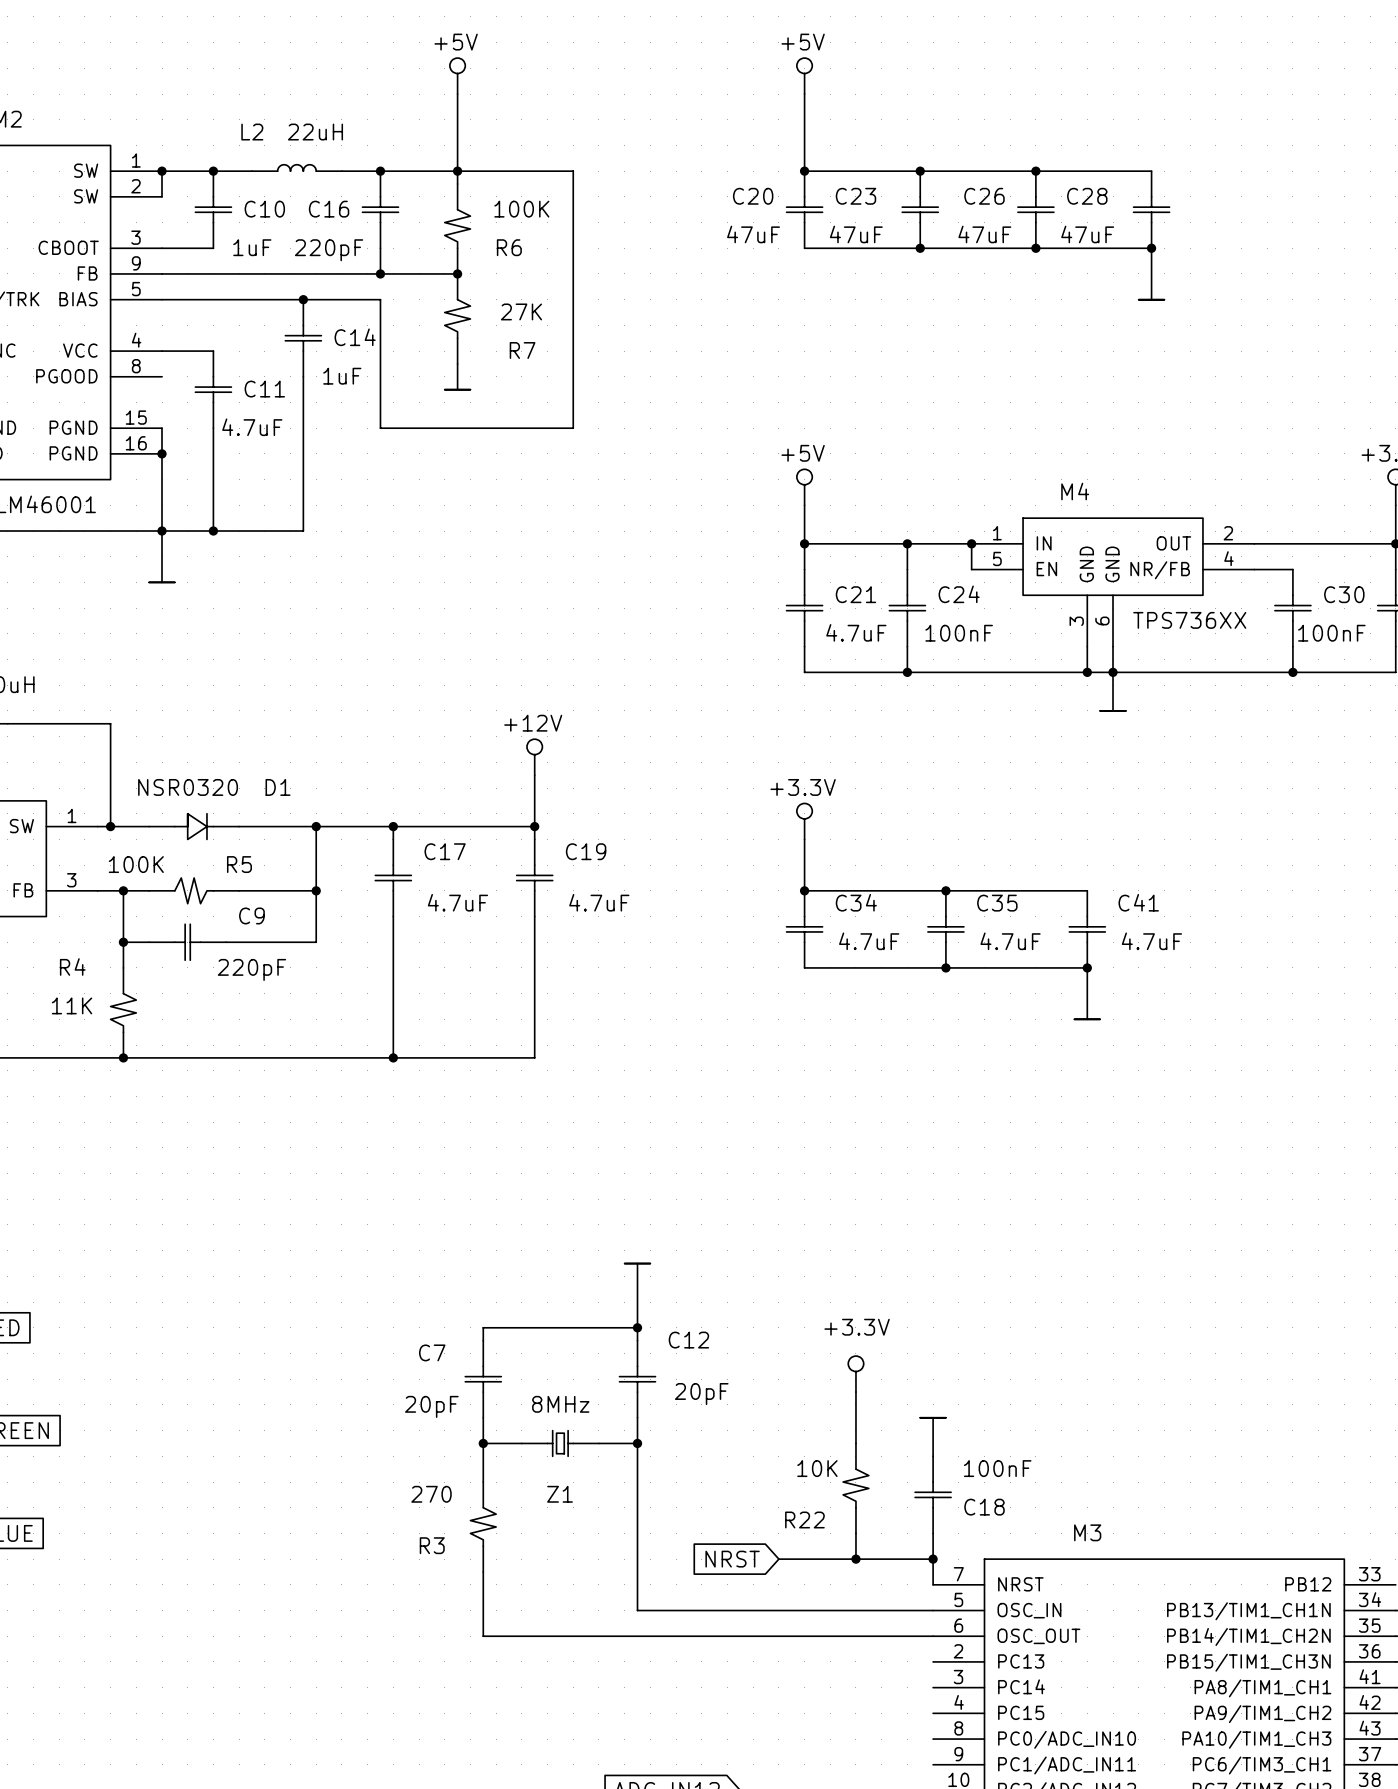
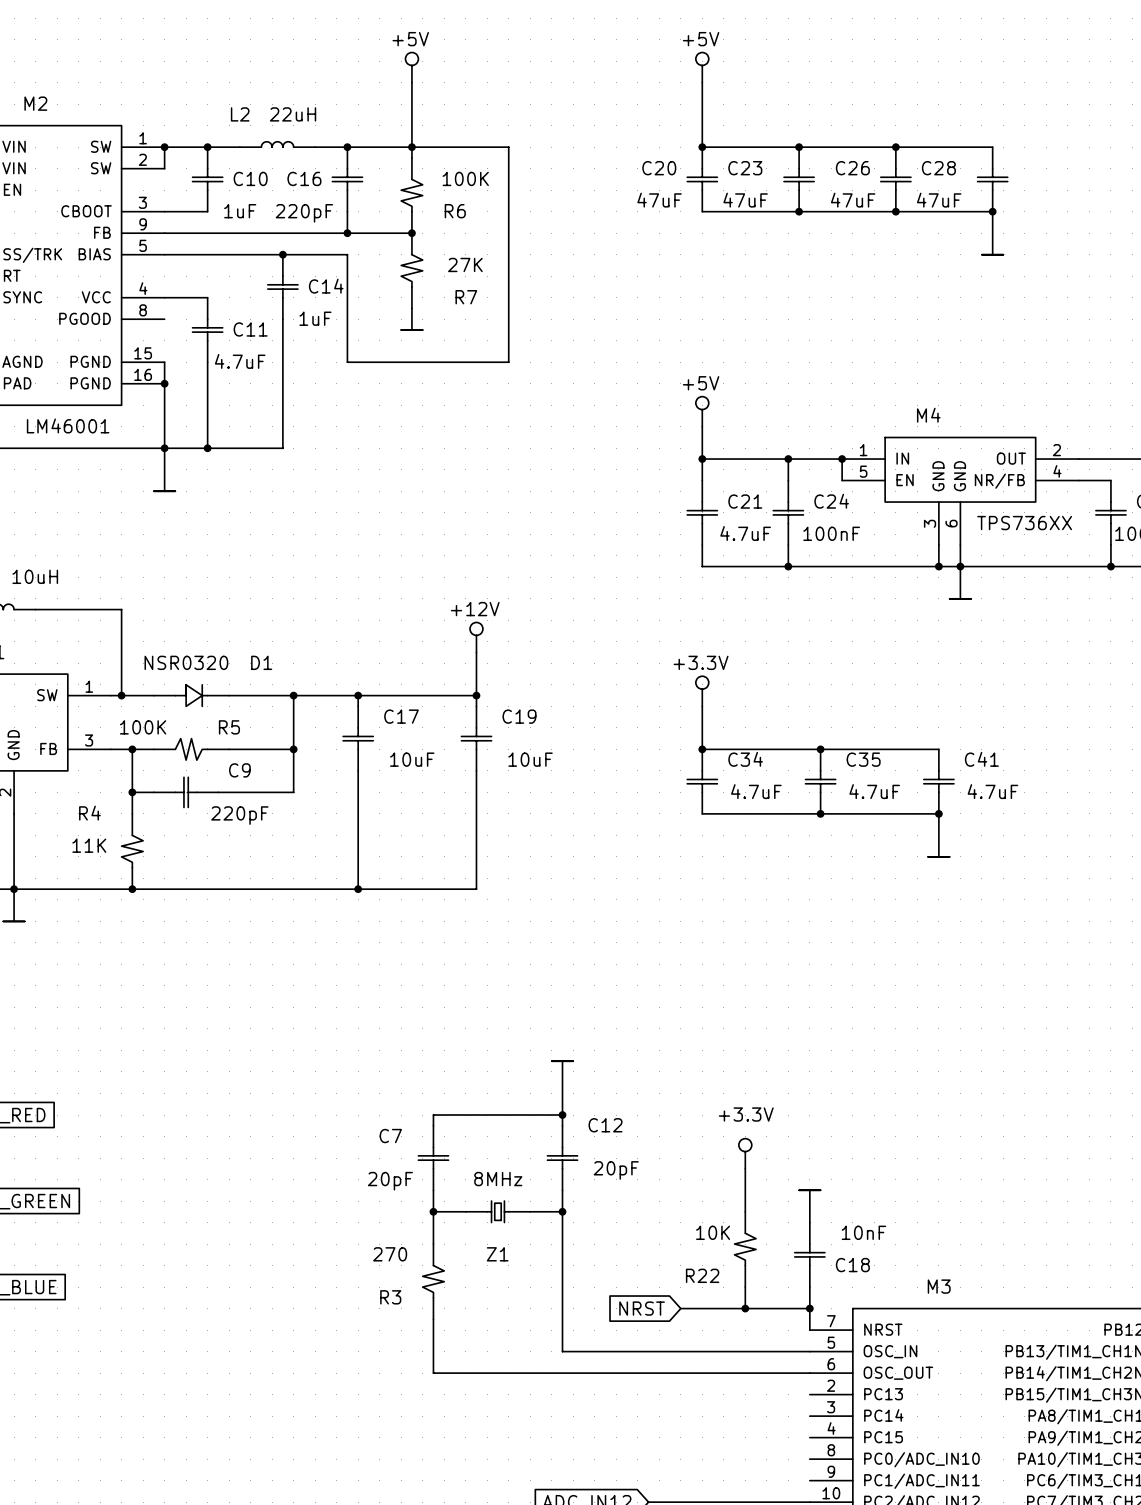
C17 value: 4.7uF (457, 902) -> 10uF (412, 759)
C19 value: 4.7uF (599, 902) -> 10uF (530, 759)
C18 value: 100nF (997, 1468) -> 10nF (863, 1232)

